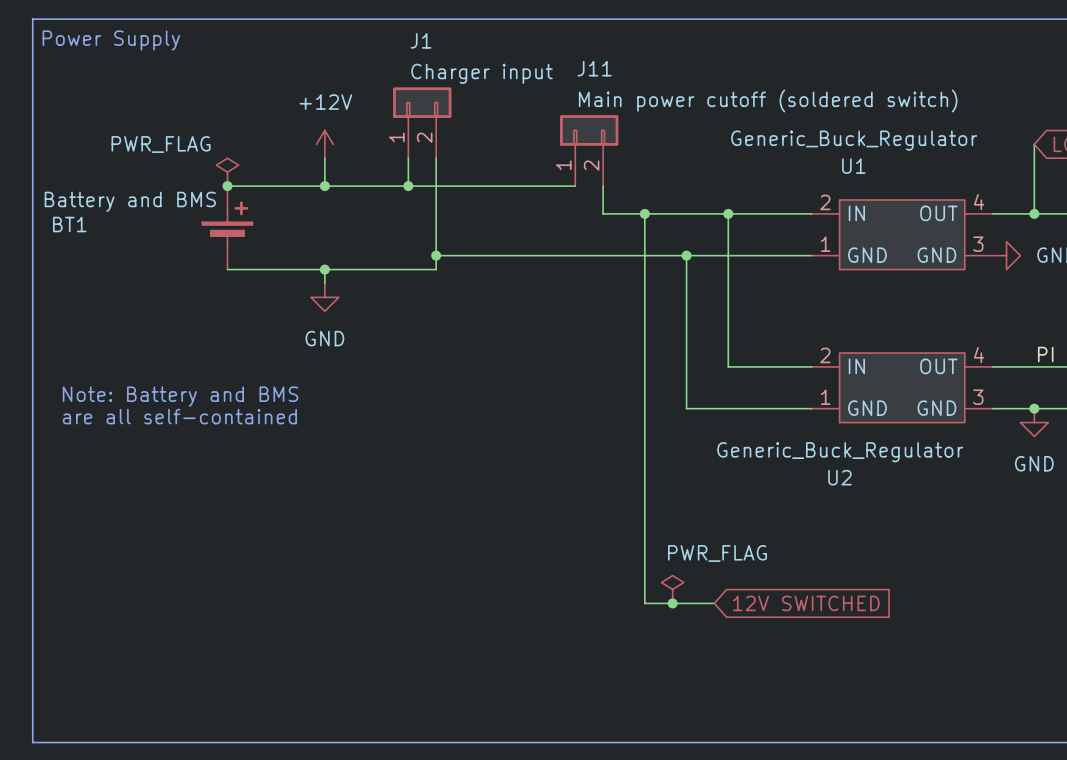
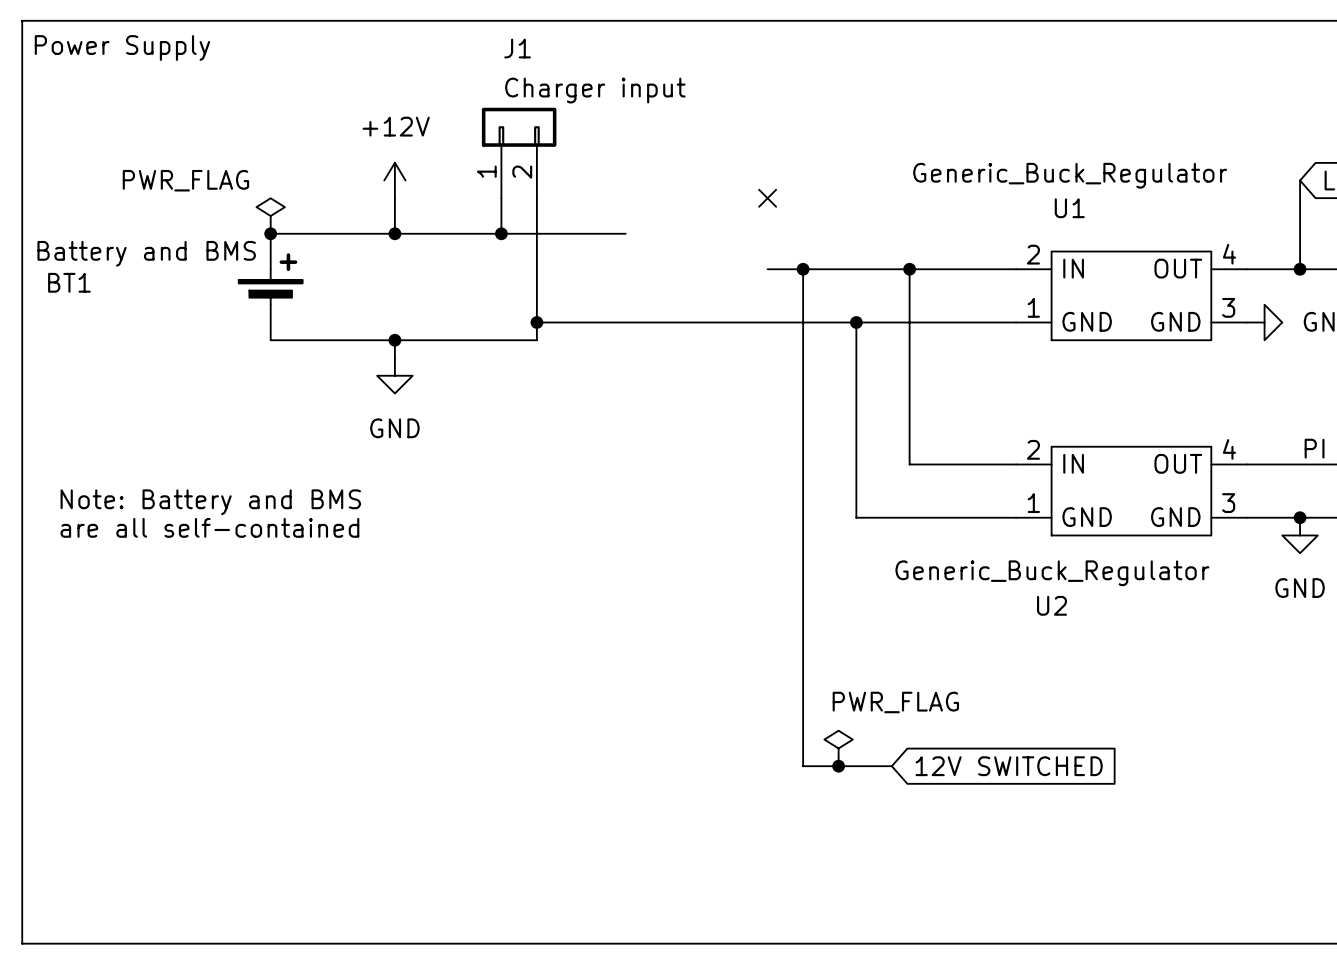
J11: Main power cutoff (soldered switch) (589, 150) -> none
no-connect mark: none -> (767, 198)
wire: (505, 186) (575, 186) -> none
wire: (603, 186) (603, 213) (617, 213) -> none

